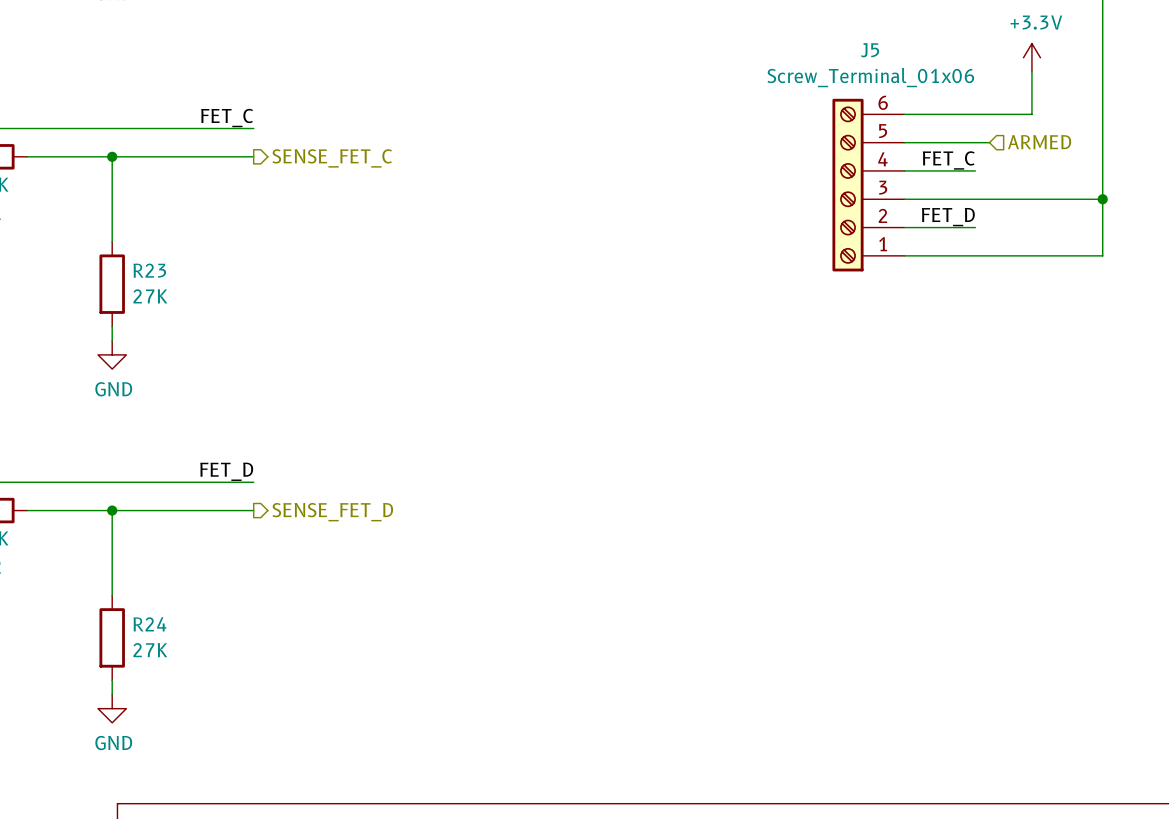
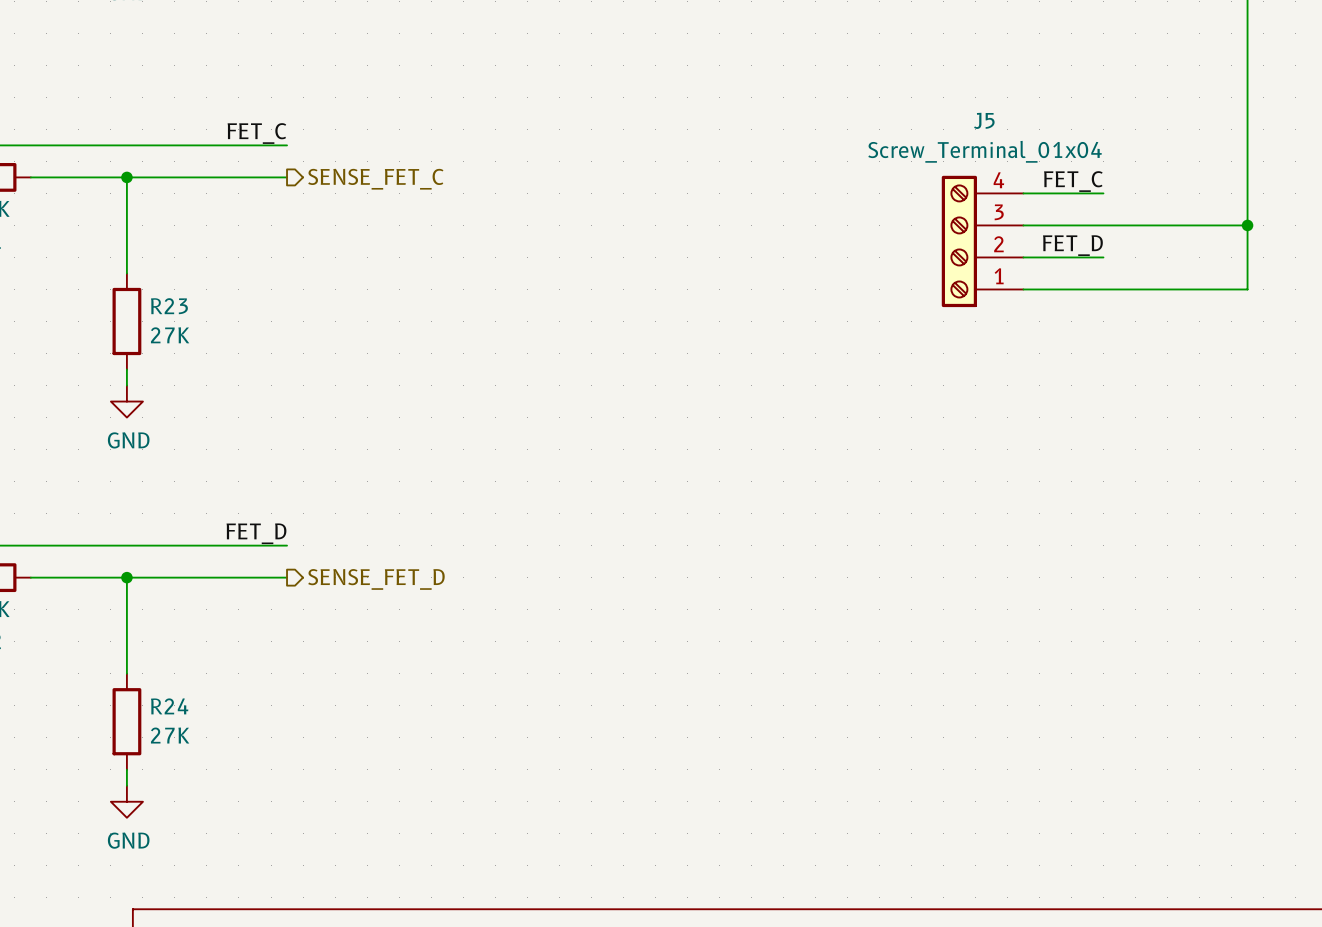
J5 name position: J5 (870, 50) -> J5 (984, 120)
power symbol: +3.3V (1031, 57) -> none
wire: (1031, 71) (1031, 114) (904, 114) -> none
J5 value: Screw_Terminal_01x06 (870, 77) -> Screw_Terminal_01x04 (985, 151)
J5 symbol: [832, 98, 905, 272] -> [941, 175, 1024, 308]
wire: (904, 142) (989, 142) -> none
hierarchical label: ARMED (1039, 142) -> none

